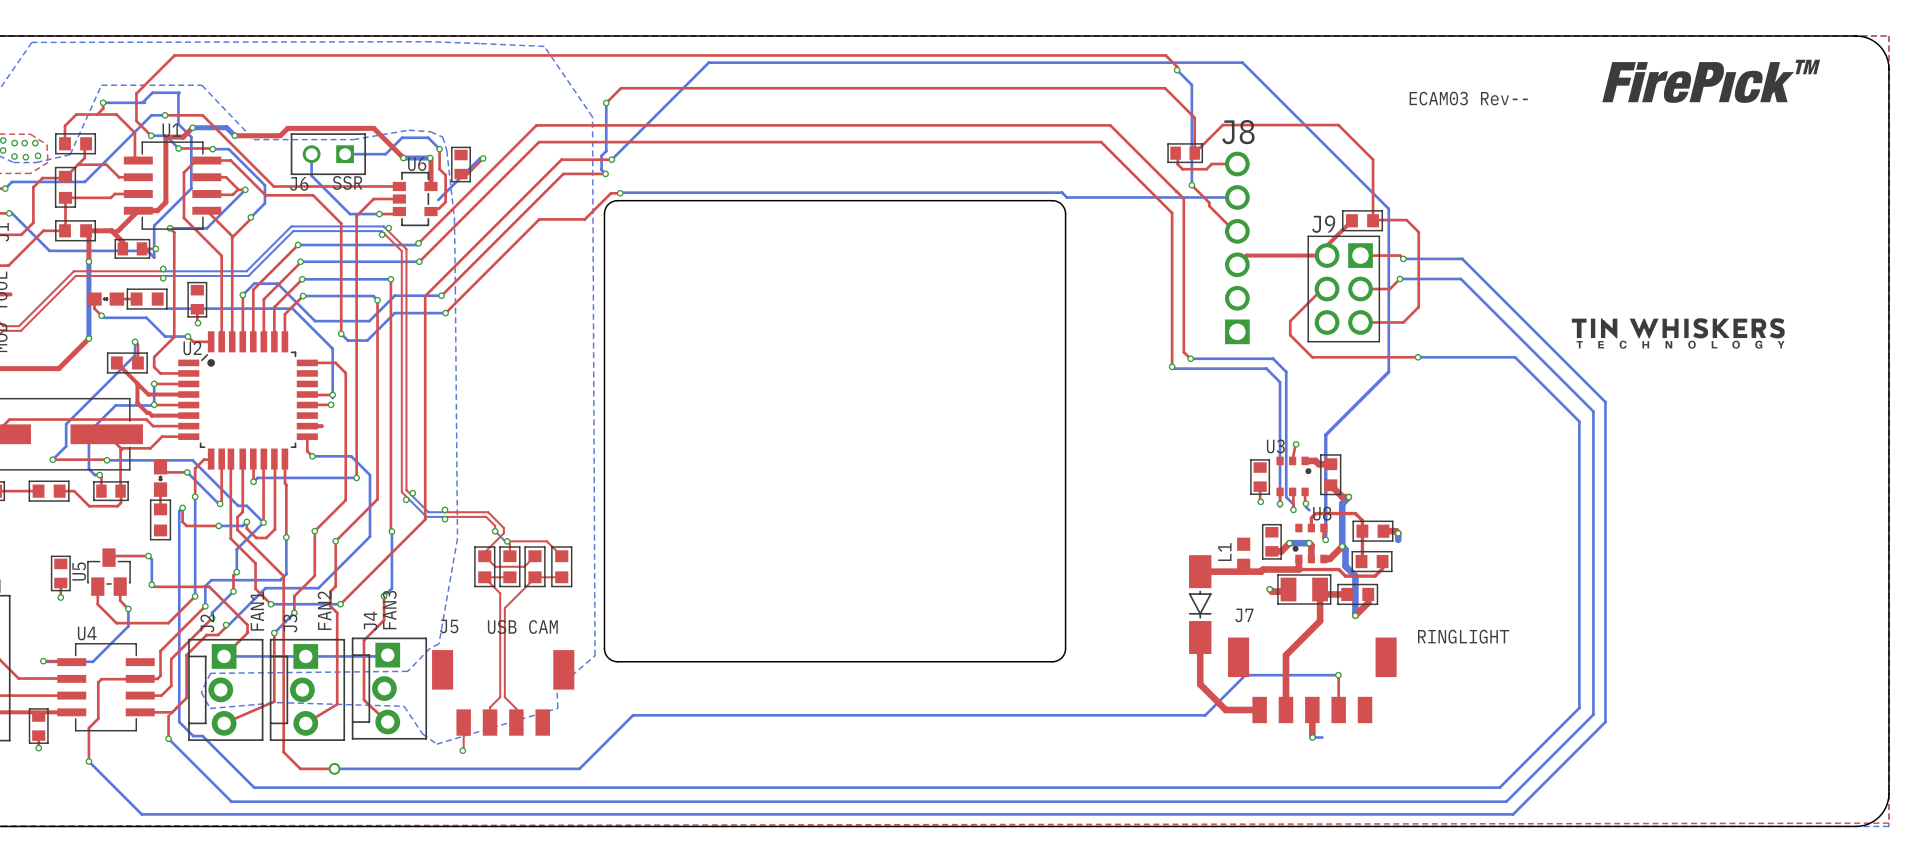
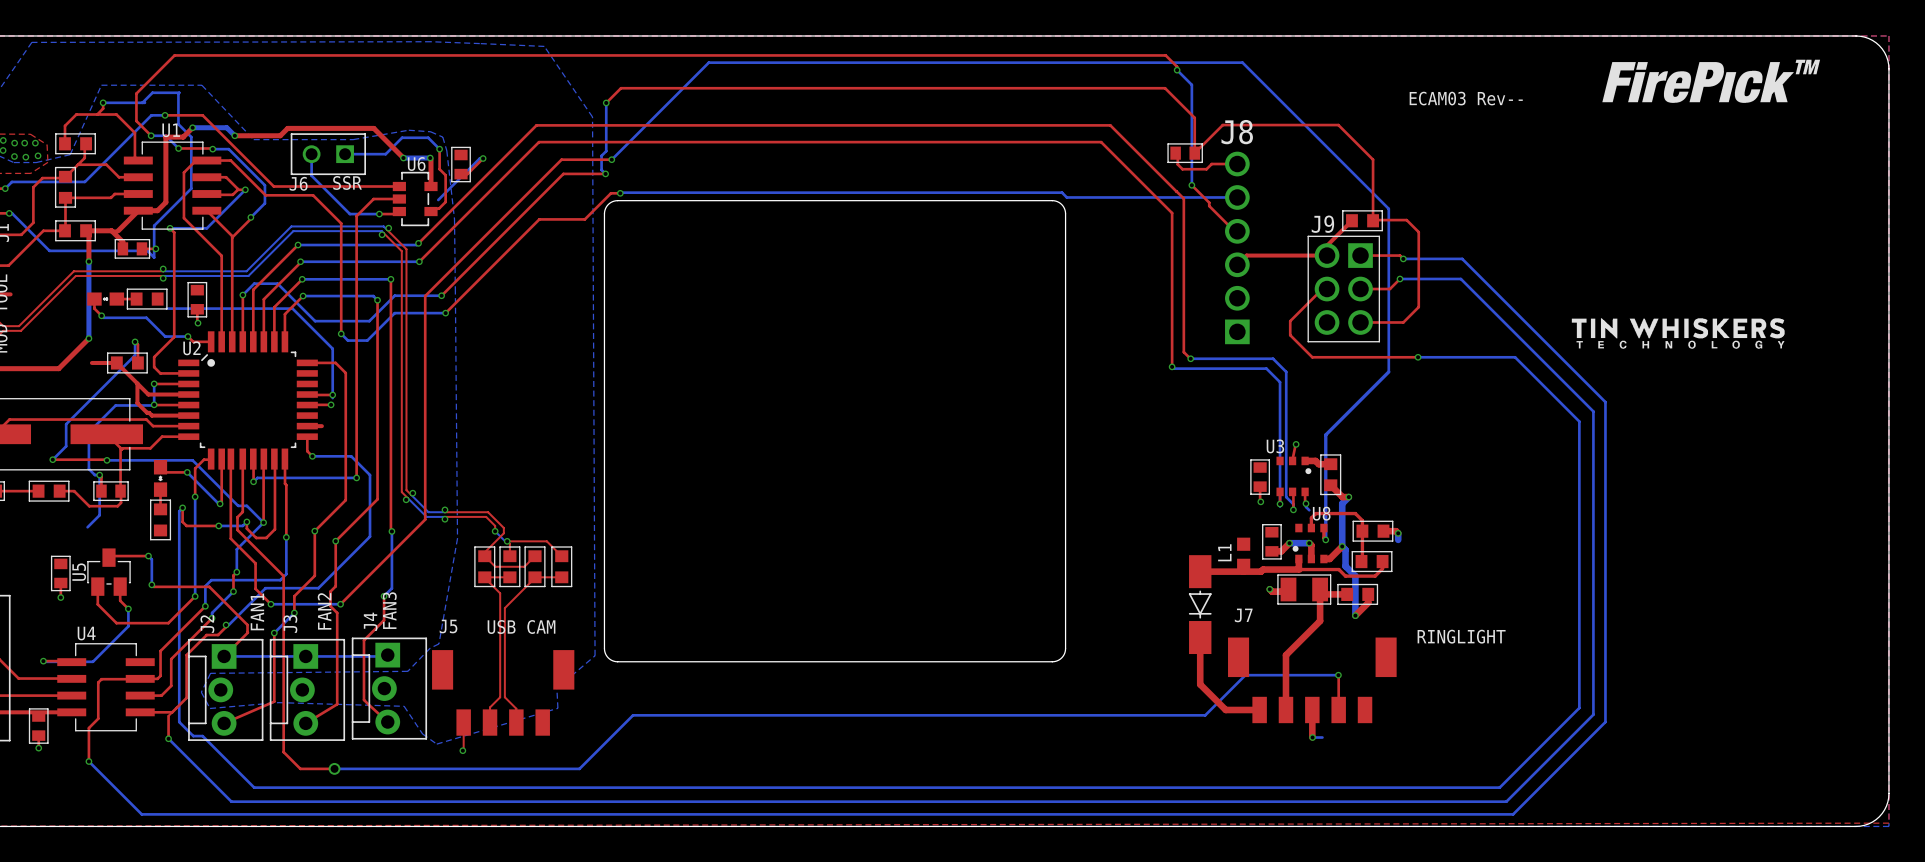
top track: none -> (91, 362) (116, 362)
bottom track: none -> (99, 475) (99, 515) (87, 527)

